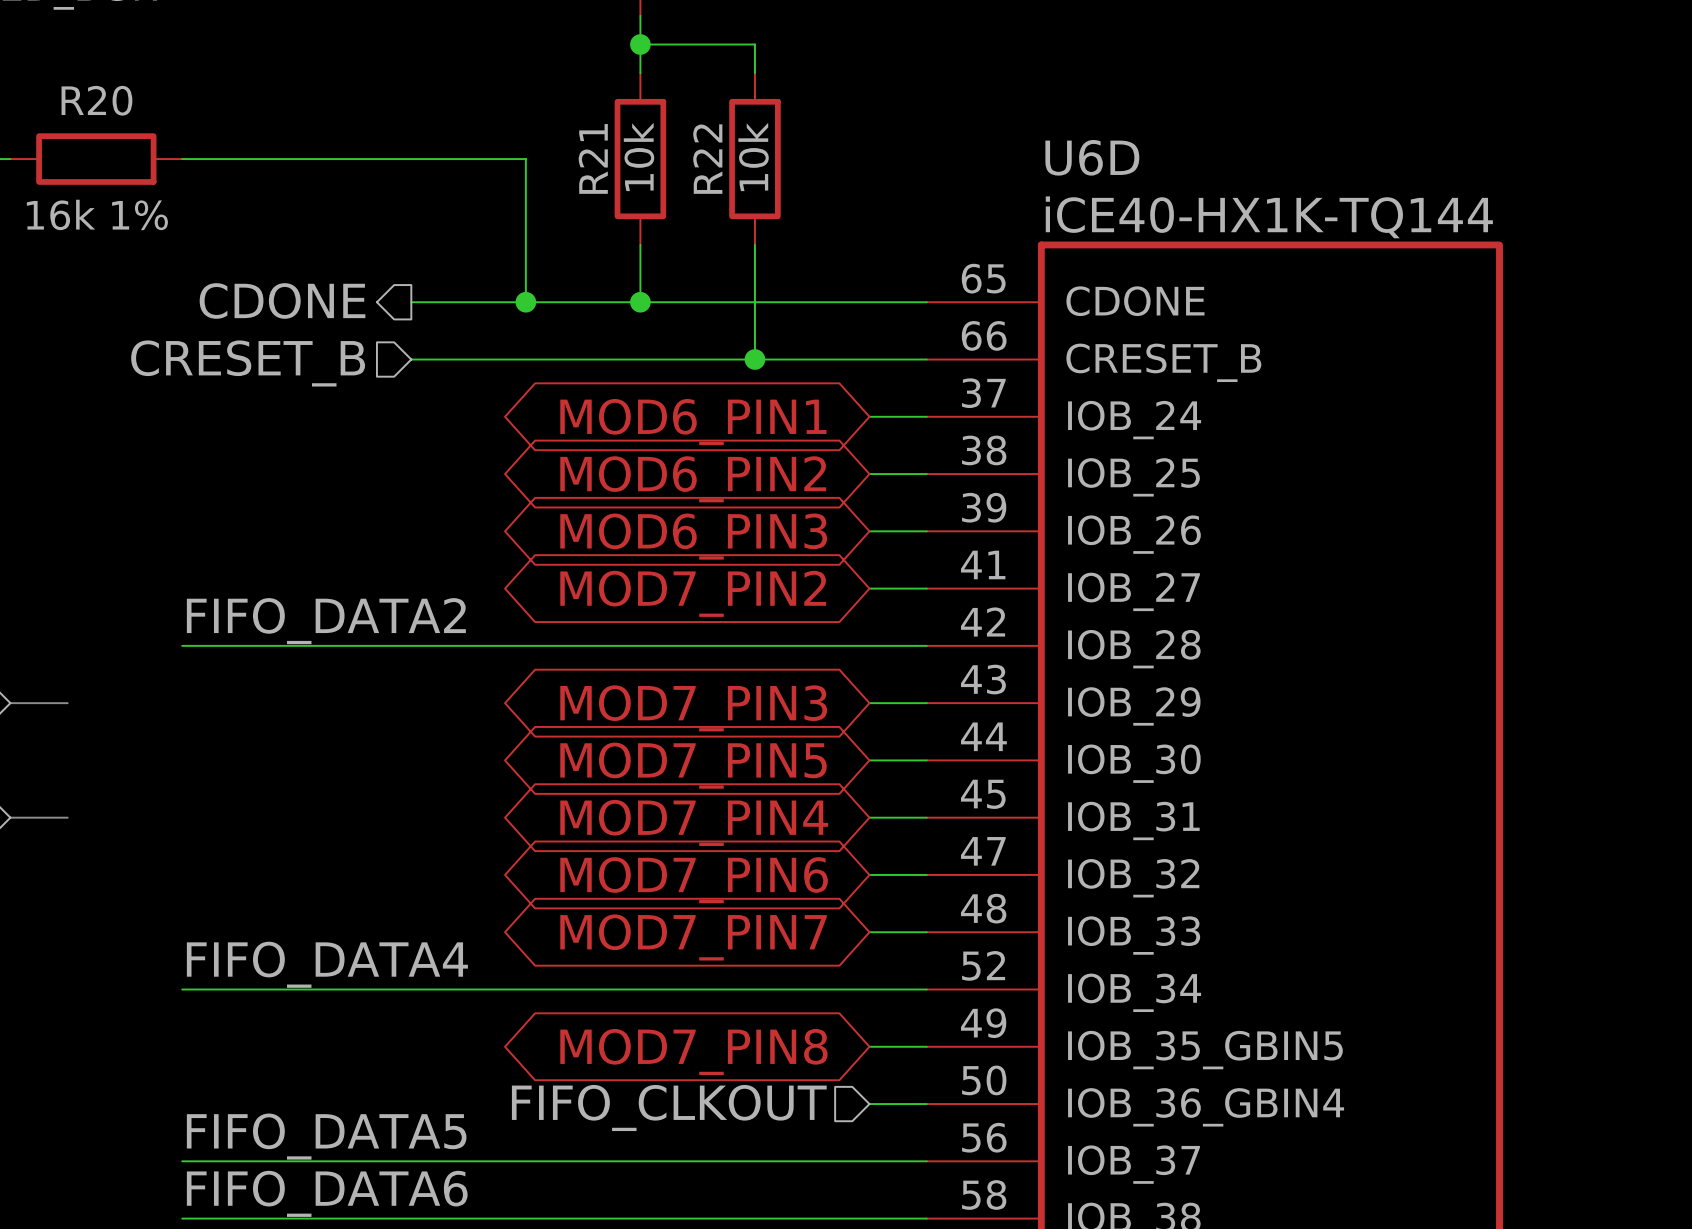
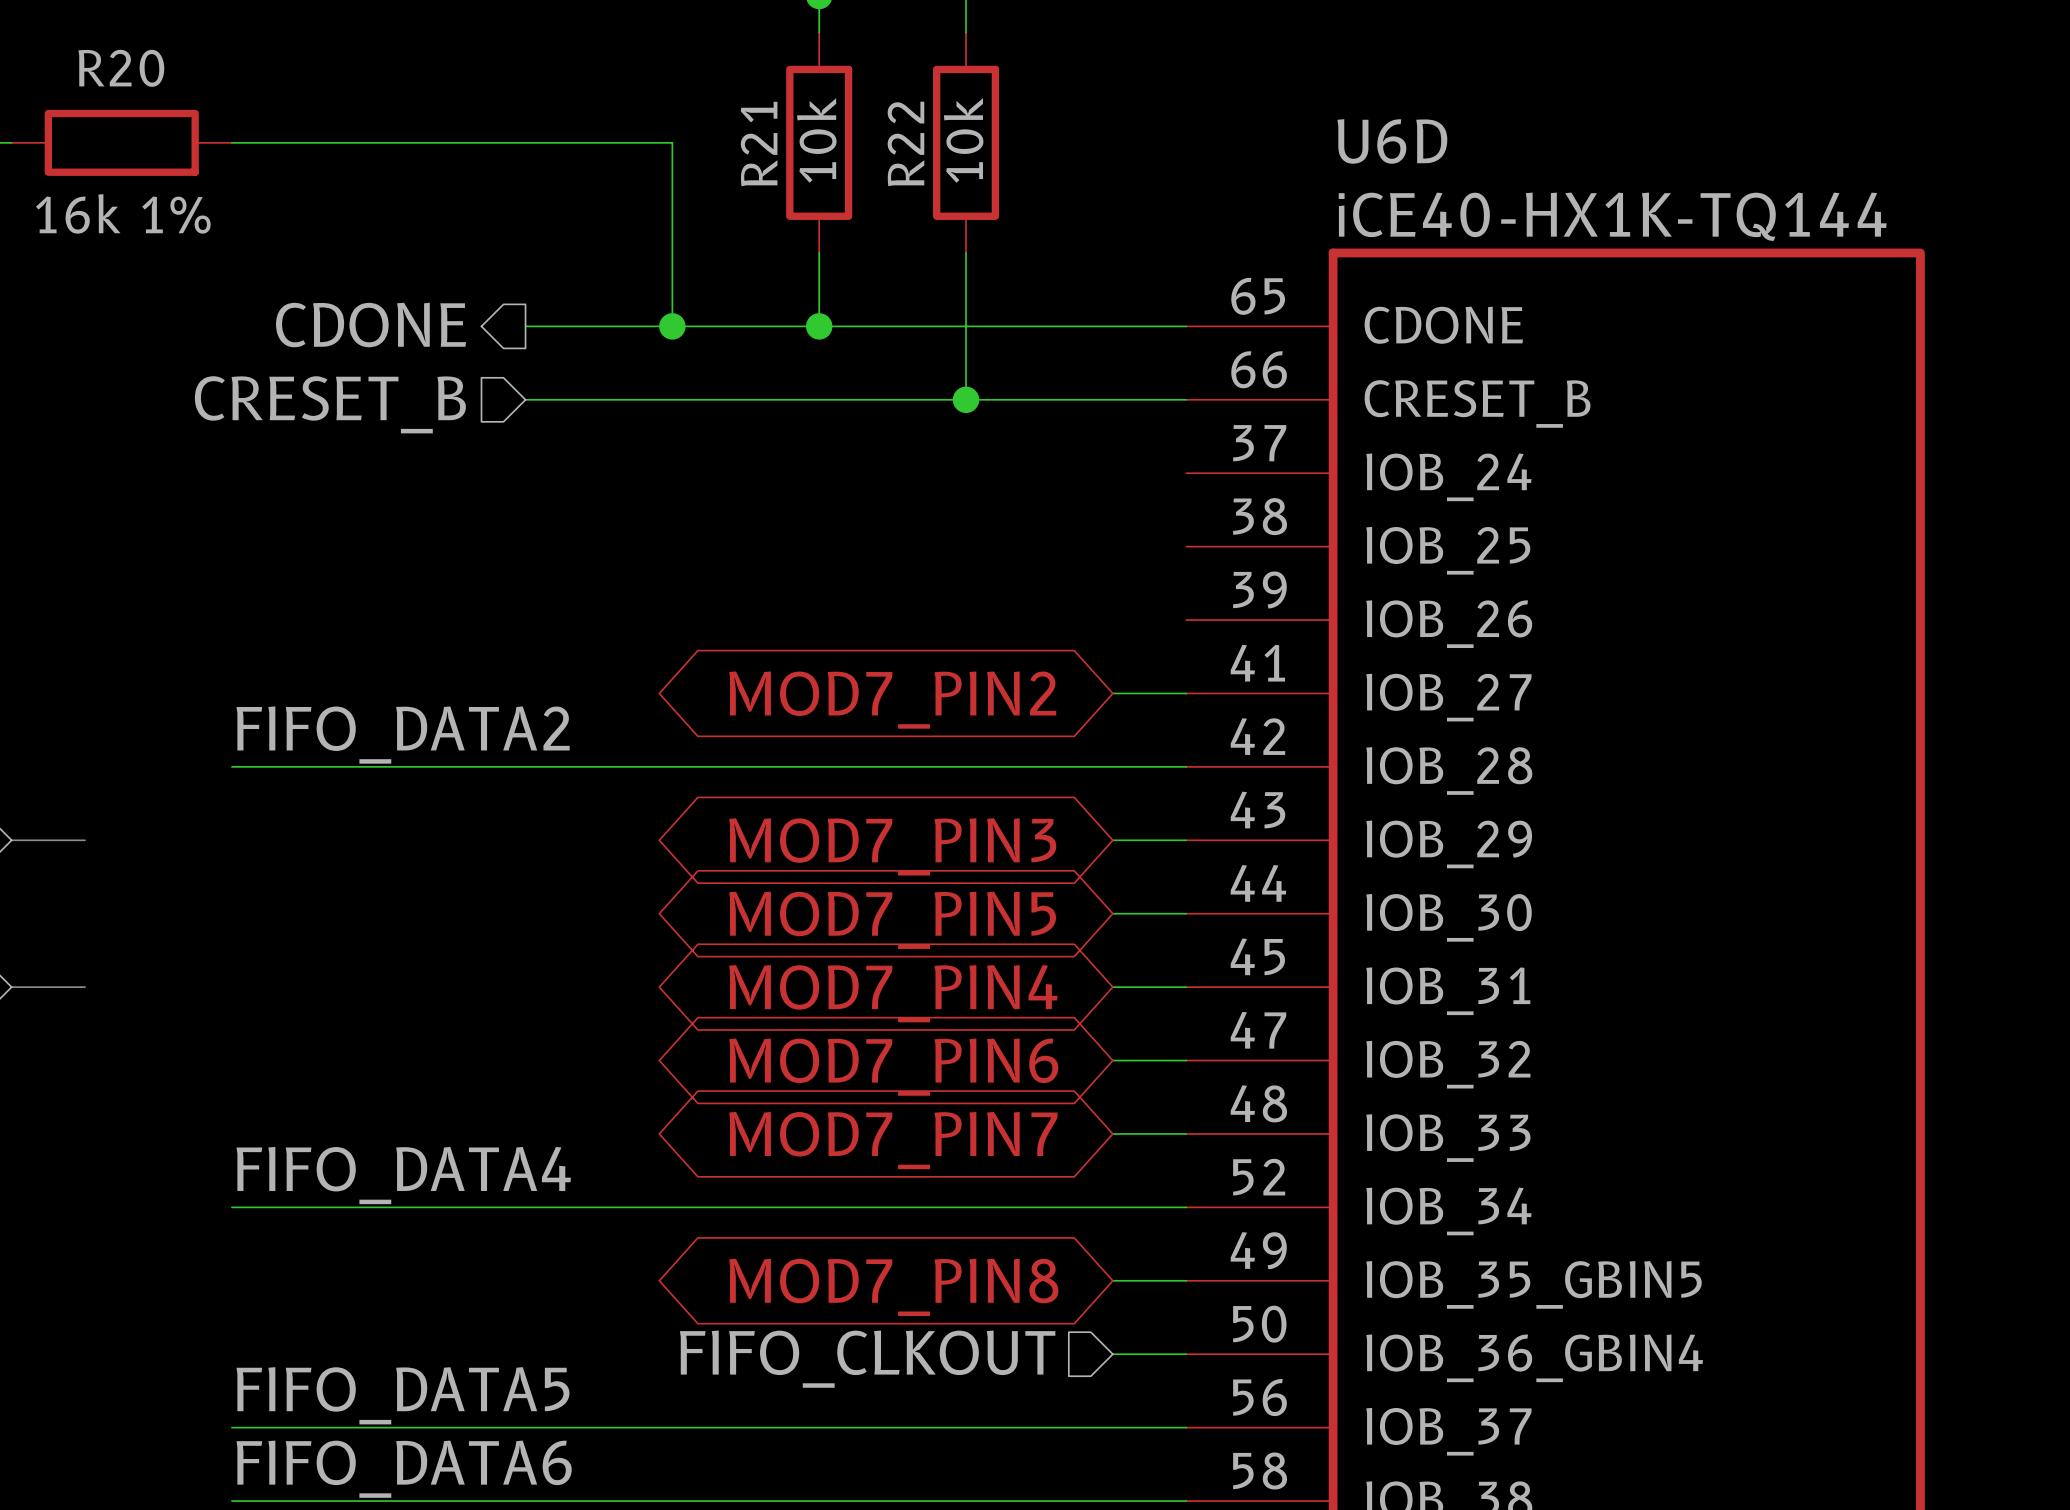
wire: (869, 416) (926, 416) -> none
global label: MOD6_PIN1 (693, 422) -> none
wire: (869, 474) (926, 474) -> none
global label: MOD6_PIN2 (693, 479) -> none
wire: (869, 531) (926, 531) -> none
global label: MOD6_PIN3 (693, 536) -> none

